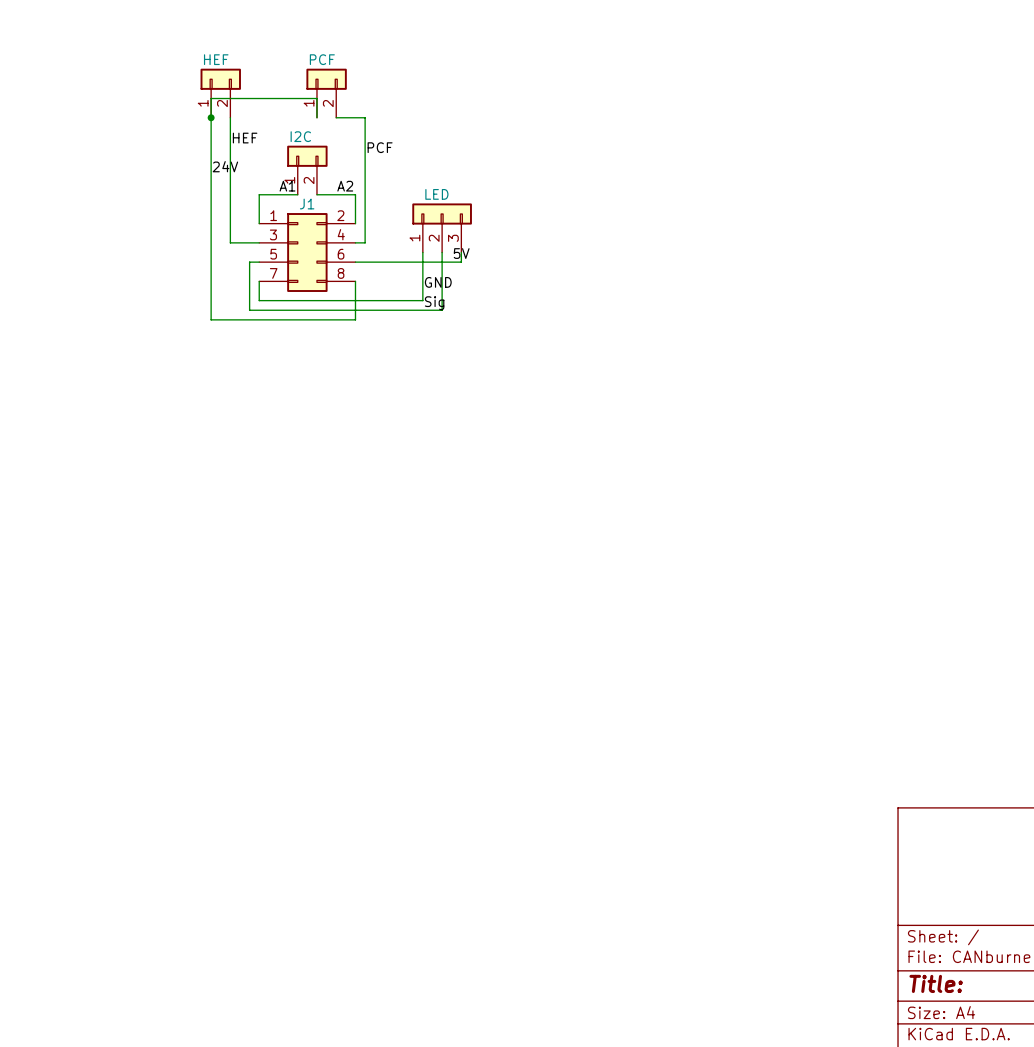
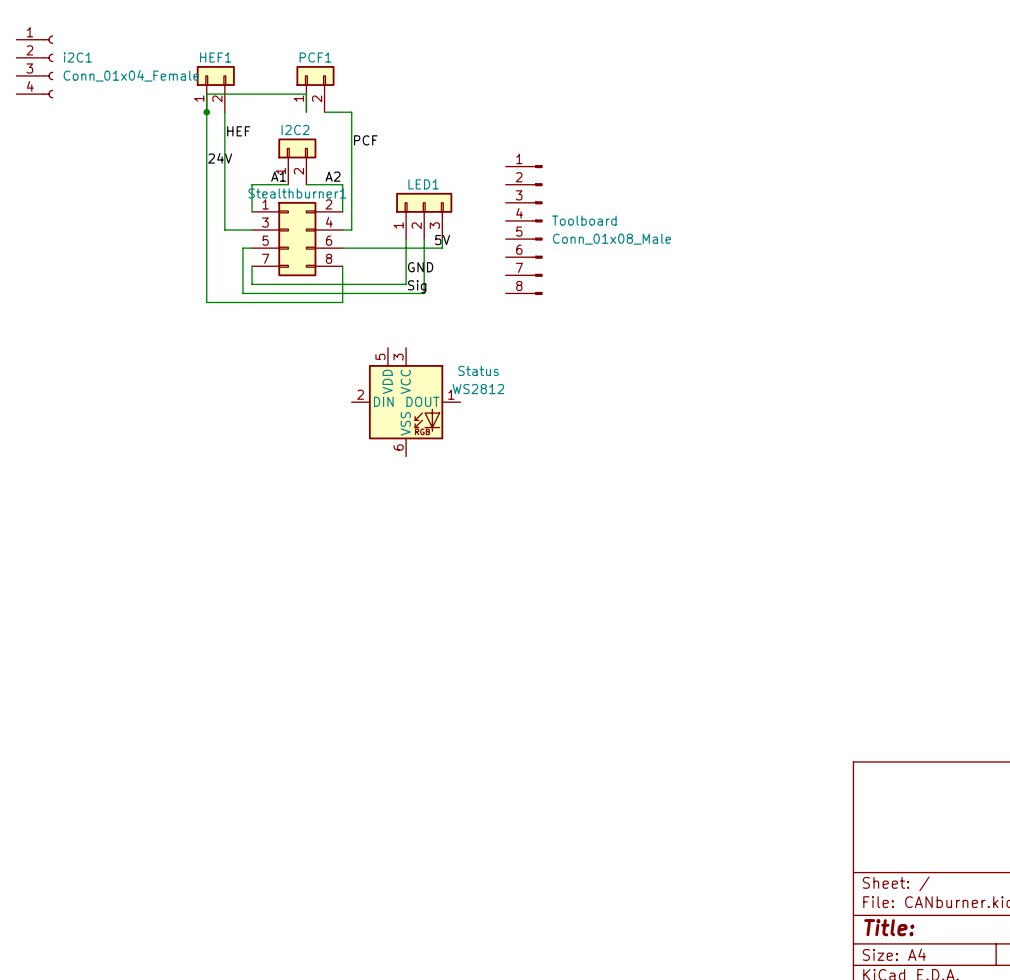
HEF name: HEF (216, 59) -> HEF1 (215, 57)
PCF name: PCF (322, 59) -> PCF1 (315, 57)
i2C1: none -> Conn_01x04_Female (34, 66)
I2C name: I2C (300, 136) -> I2C2 (295, 130)
LED name: LED (436, 194) -> LED1 (423, 184)
J1 name: J1 (307, 204) -> Stealthburner1 (297, 193)
Toolboard: none -> Conn_01x08_Male (524, 230)
Status: none -> WS2812 (406, 402)

